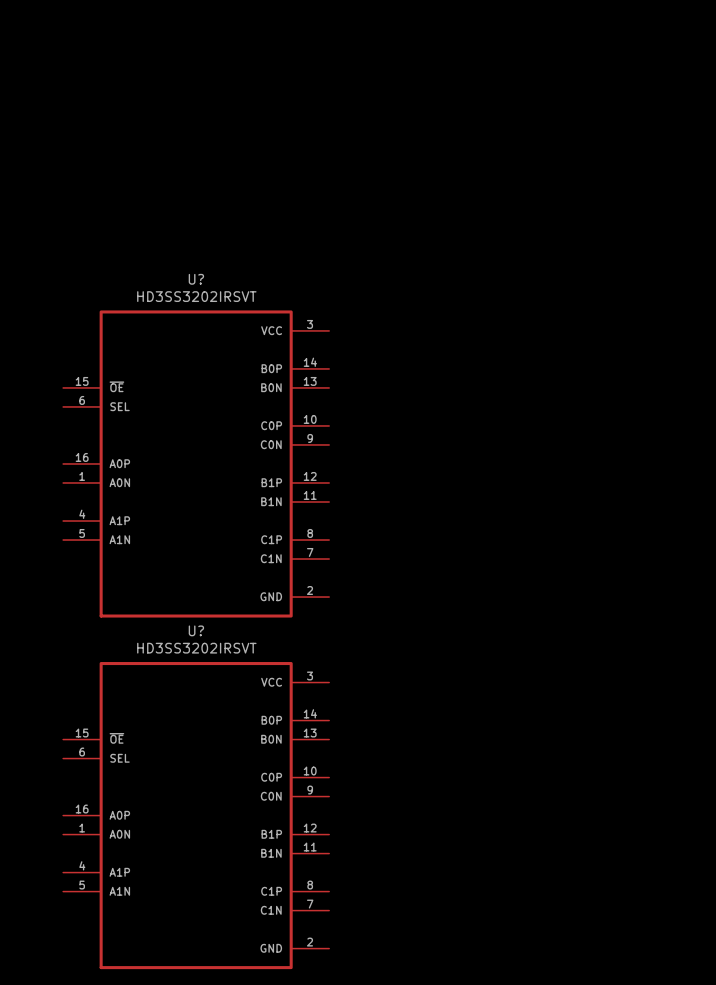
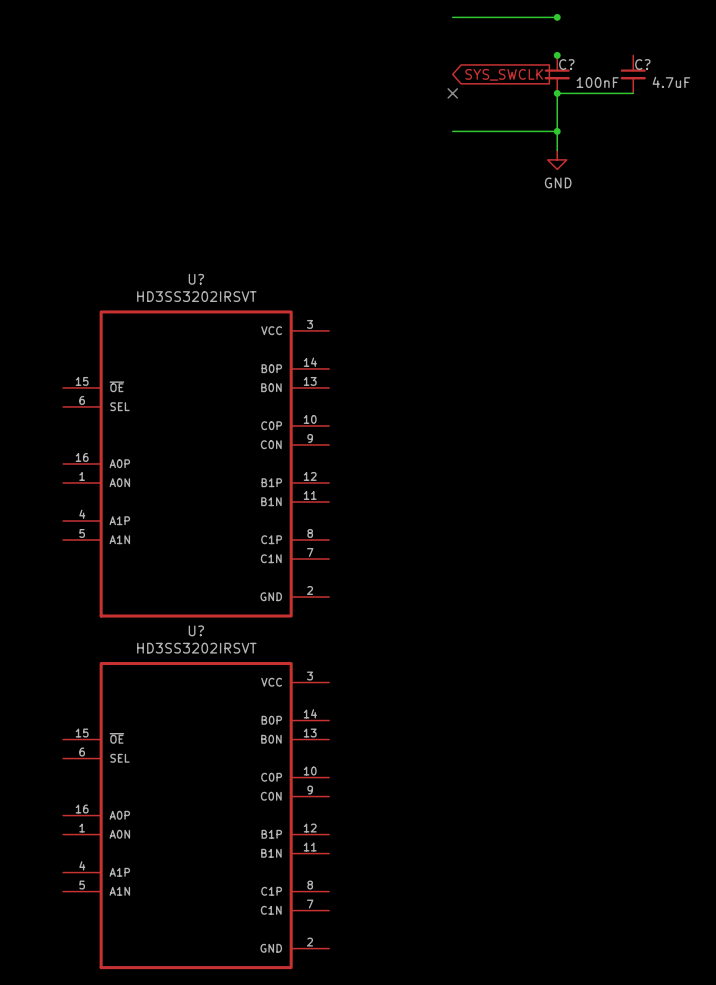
wire: none -> (452, 17) (557, 17)
junction: none -> (557, 17)
junction: none -> (557, 55)
global label: none -> SYS_SWCLK (504, 74)
C?: none -> 100nF (557, 74)
C?: none -> 4.7uF (633, 74)
no-connect mark: none -> (452, 93)
junction: none -> (557, 93)
wire: none -> (633, 93) (557, 93) (557, 150)
wire: none -> (452, 131) (557, 131)
junction: none -> (557, 131)
power symbol: none -> GND (557, 159)

